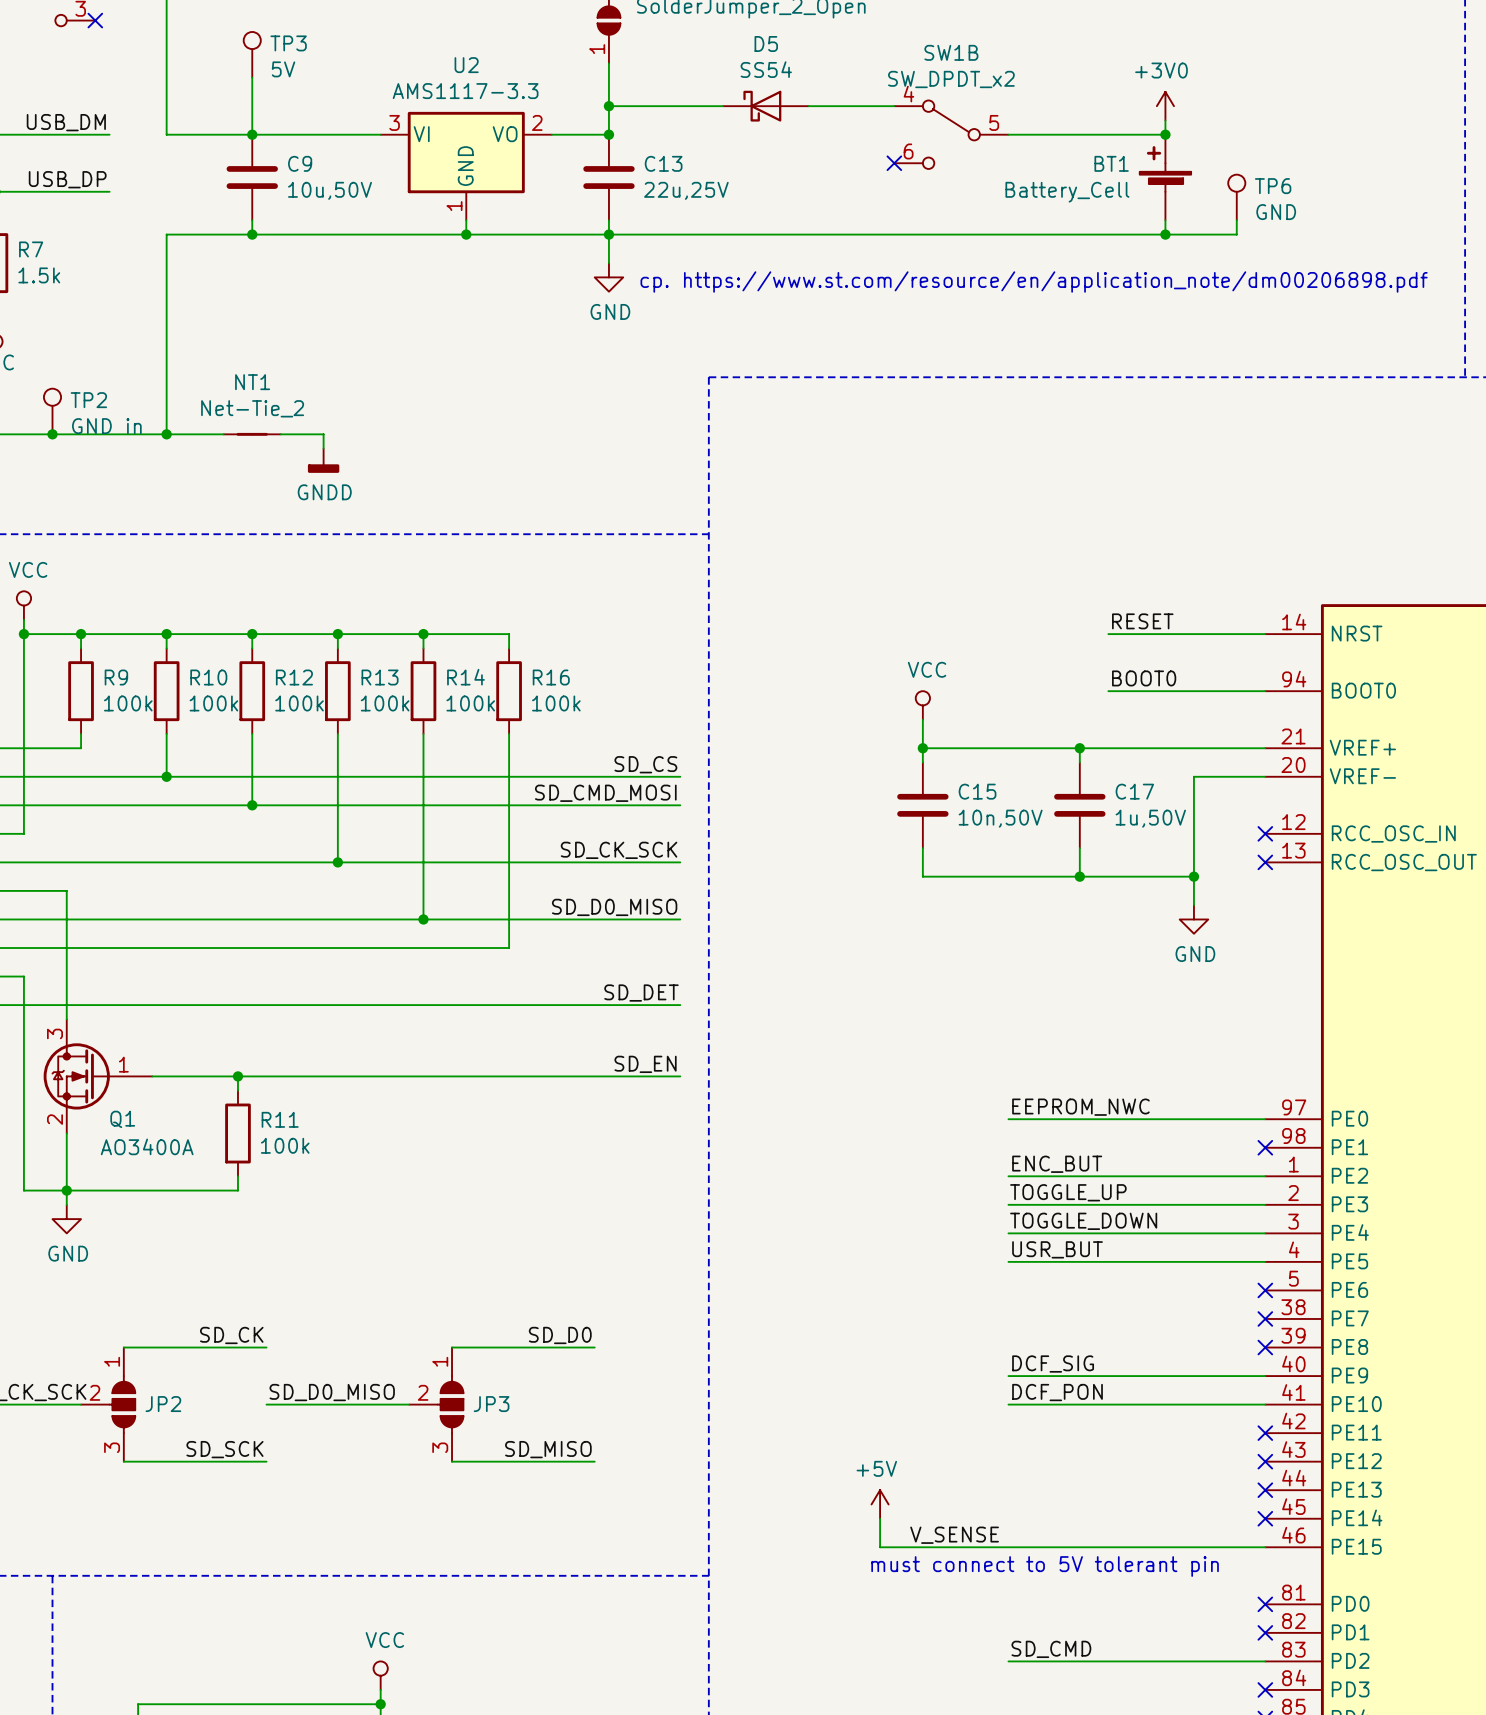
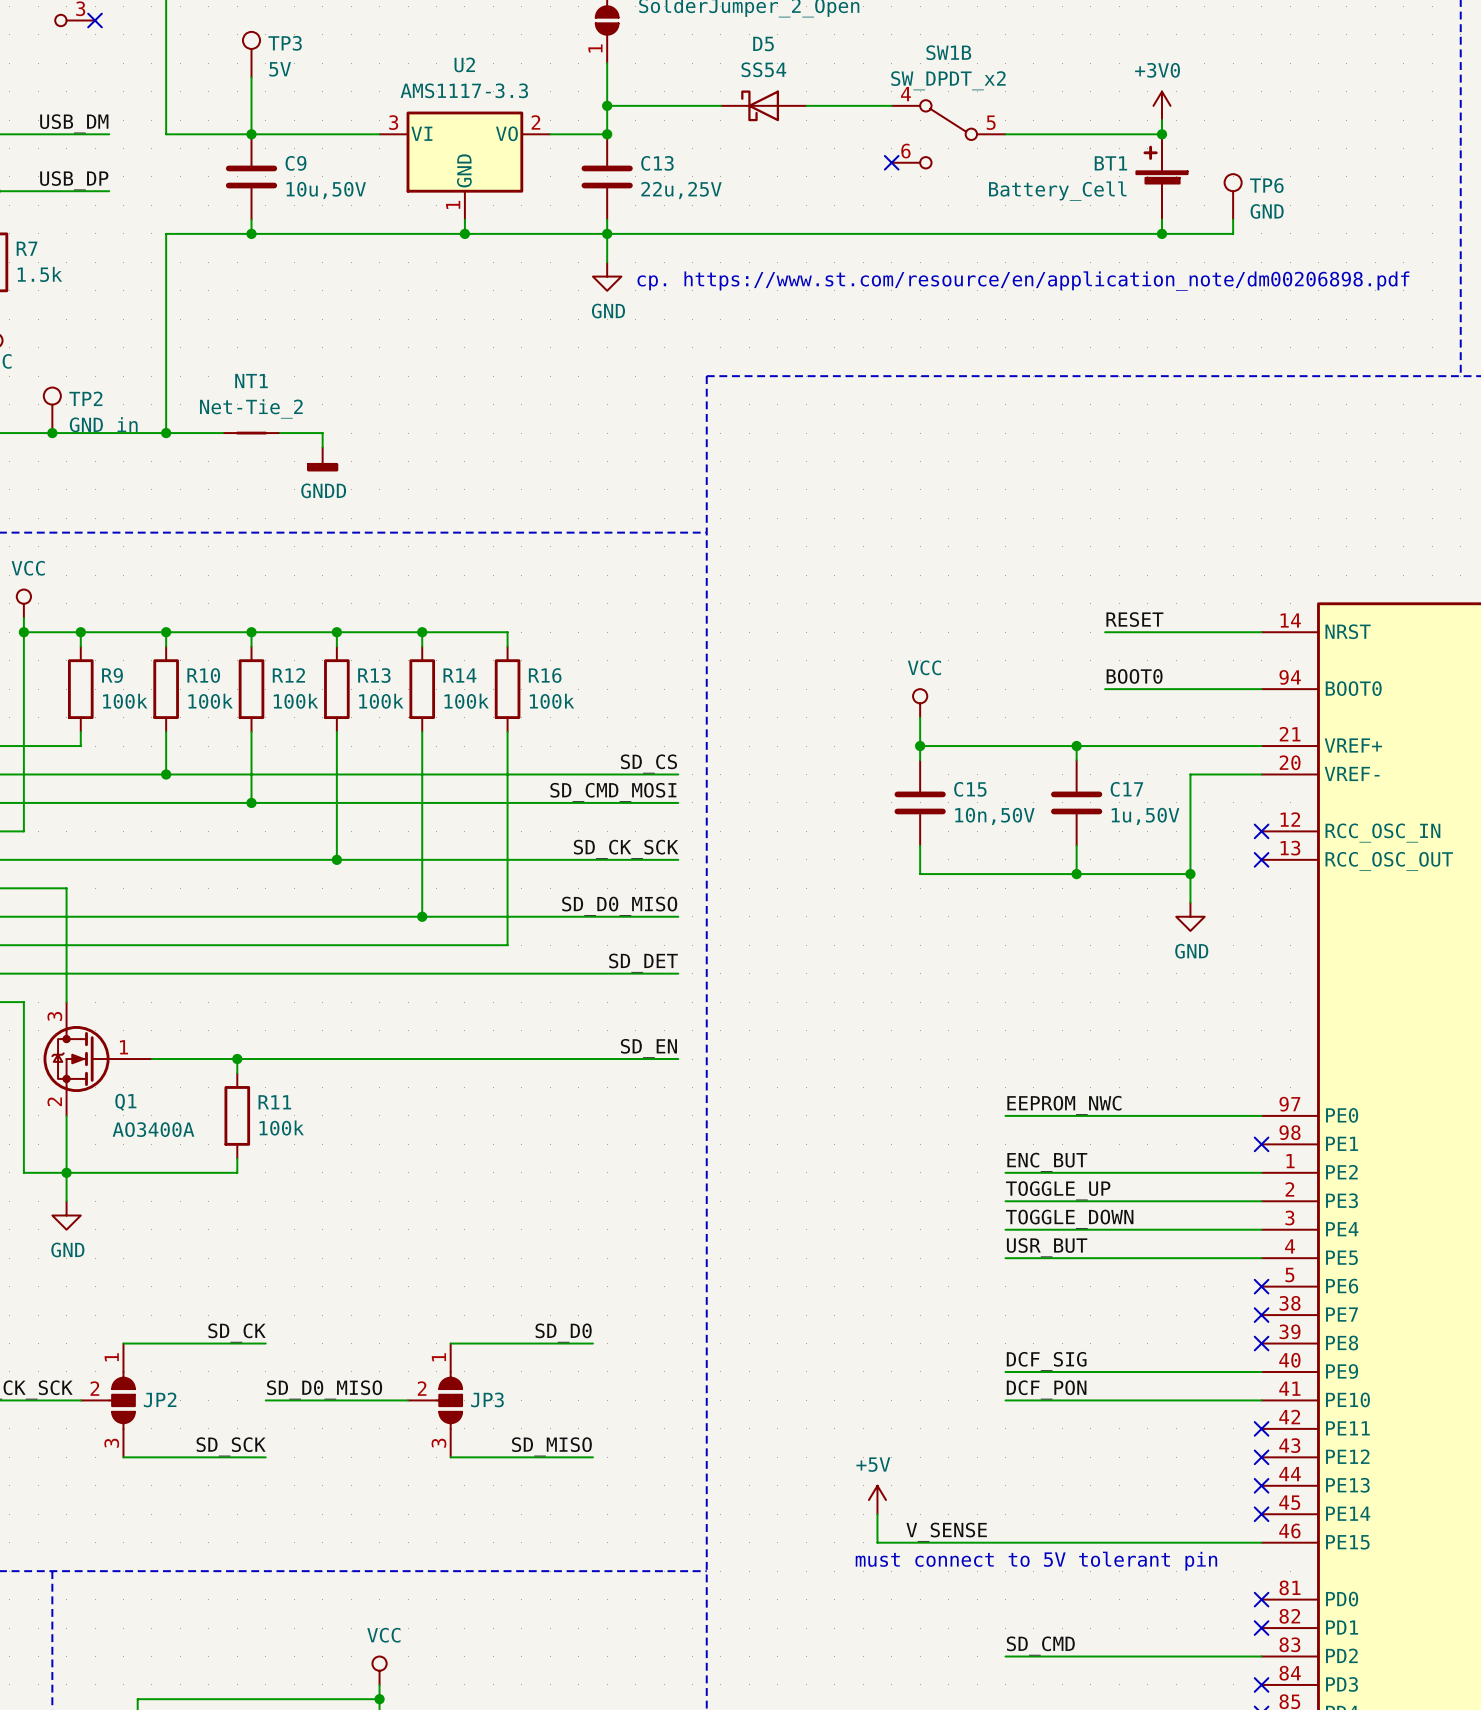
wire: (23, 976) (23, 1005) (680, 1005) -> (23, 973) (678, 973)
label position: SD_DET (641, 993) -> SD_DET (643, 963)
label position: SD_EN (645, 1064) -> SD_EN (648, 1048)
Q1 position: (98, 1076) -> (97, 1059)
wire: (152, 1076) (680, 1076) -> (151, 1059) (678, 1059)
junction position: (237, 1076) -> (237, 1059)
R11 position: (237, 1133) -> (237, 1115)
wire: (23, 1176) (23, 1190) (237, 1190) (237, 1176) -> (23, 1172) (237, 1172) (237, 1158)
junction position: (66, 1190) -> (66, 1172)

